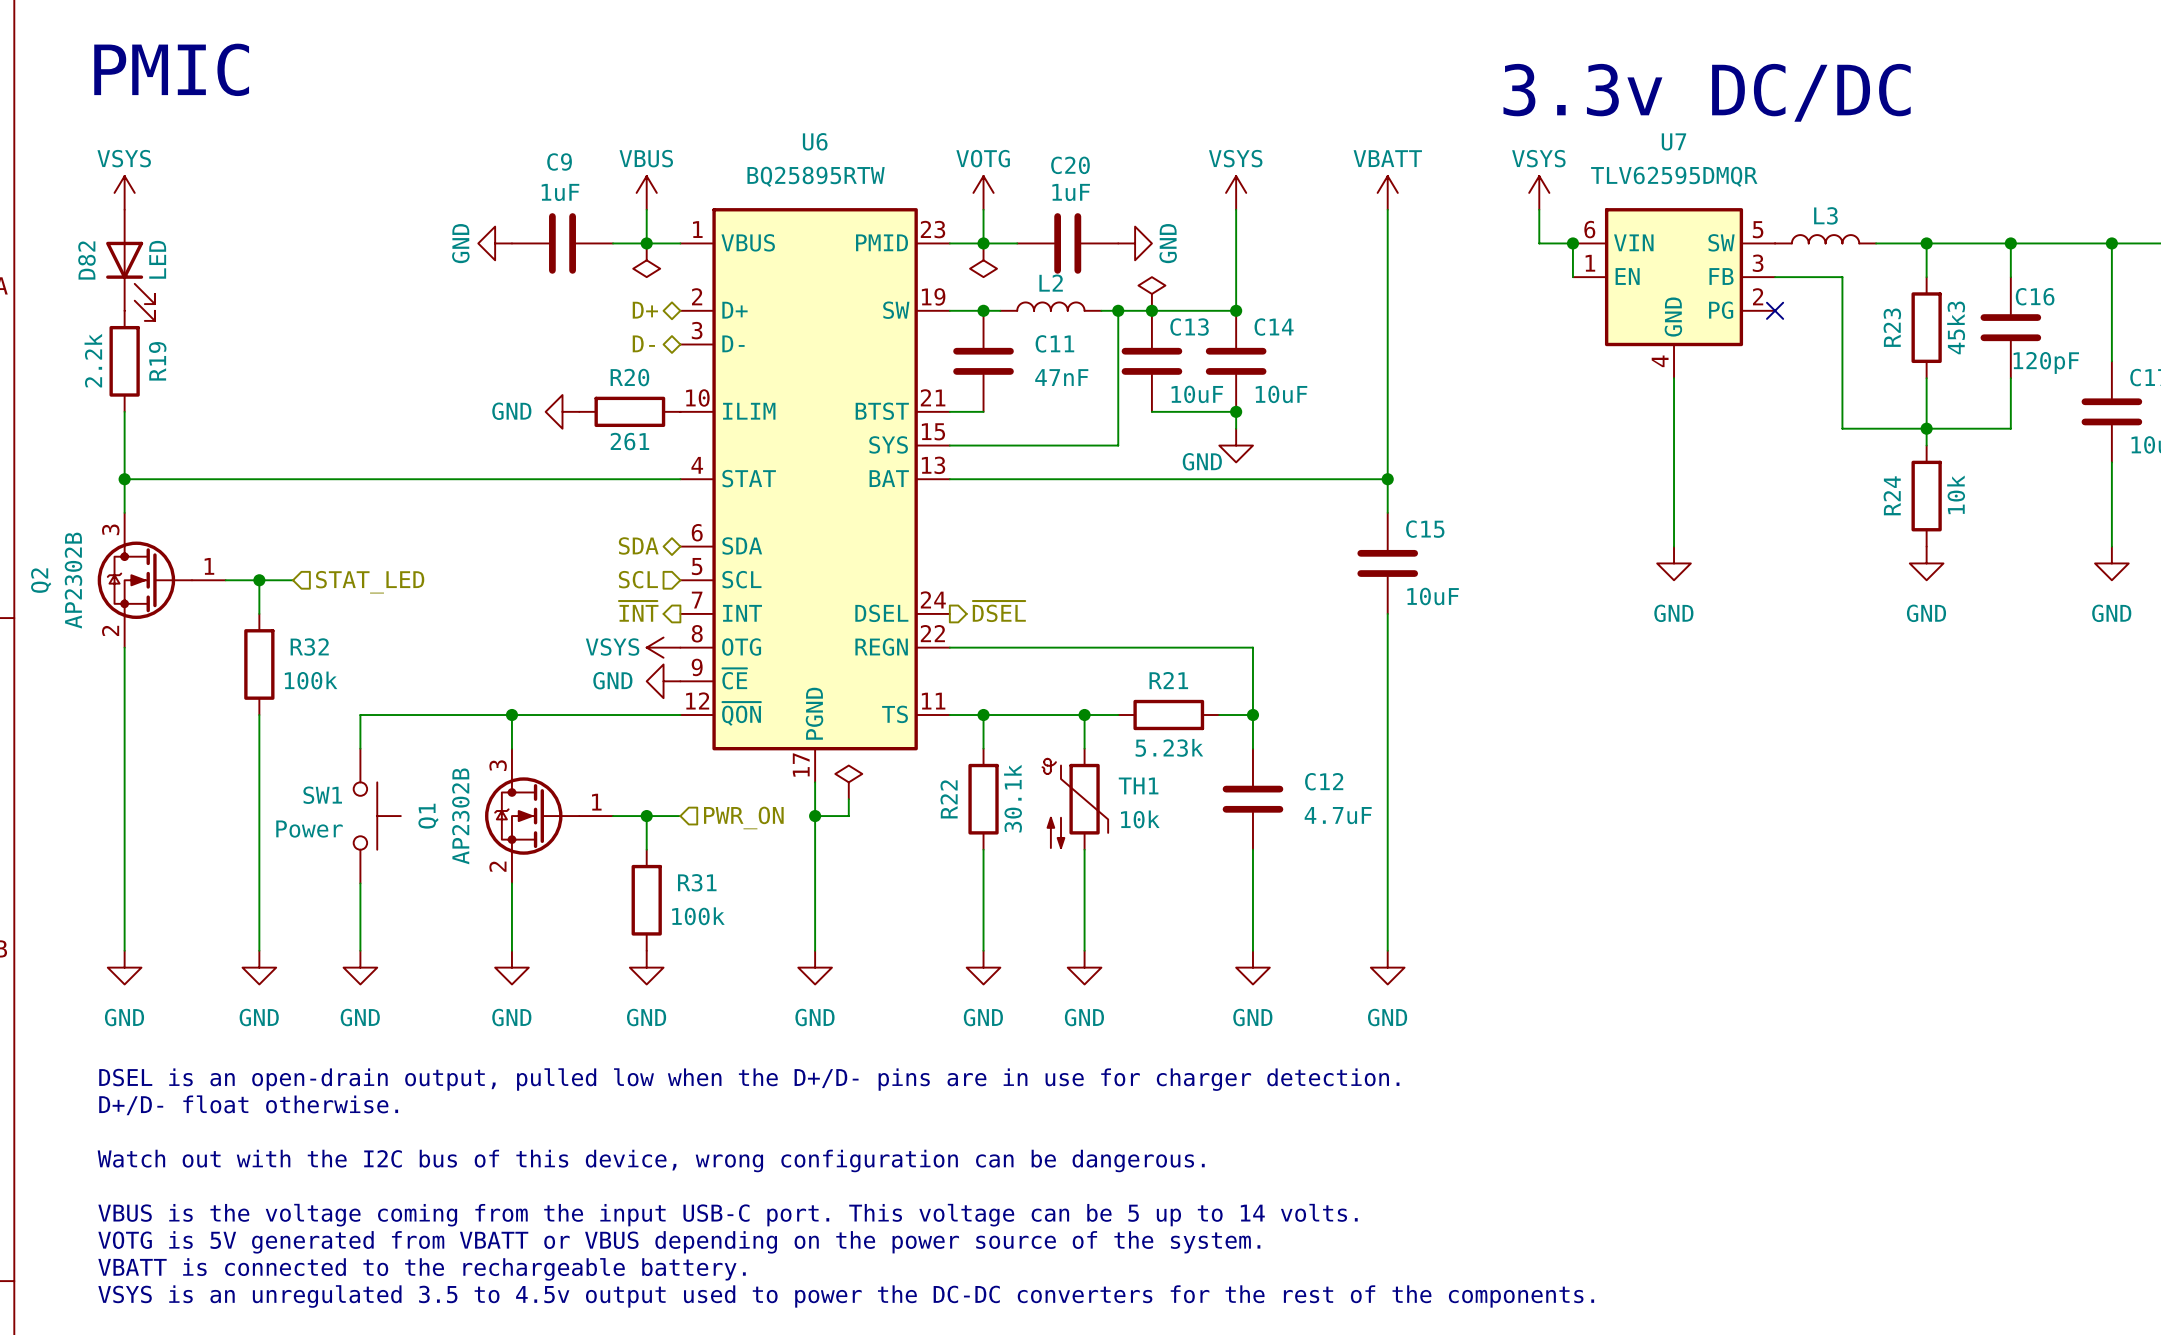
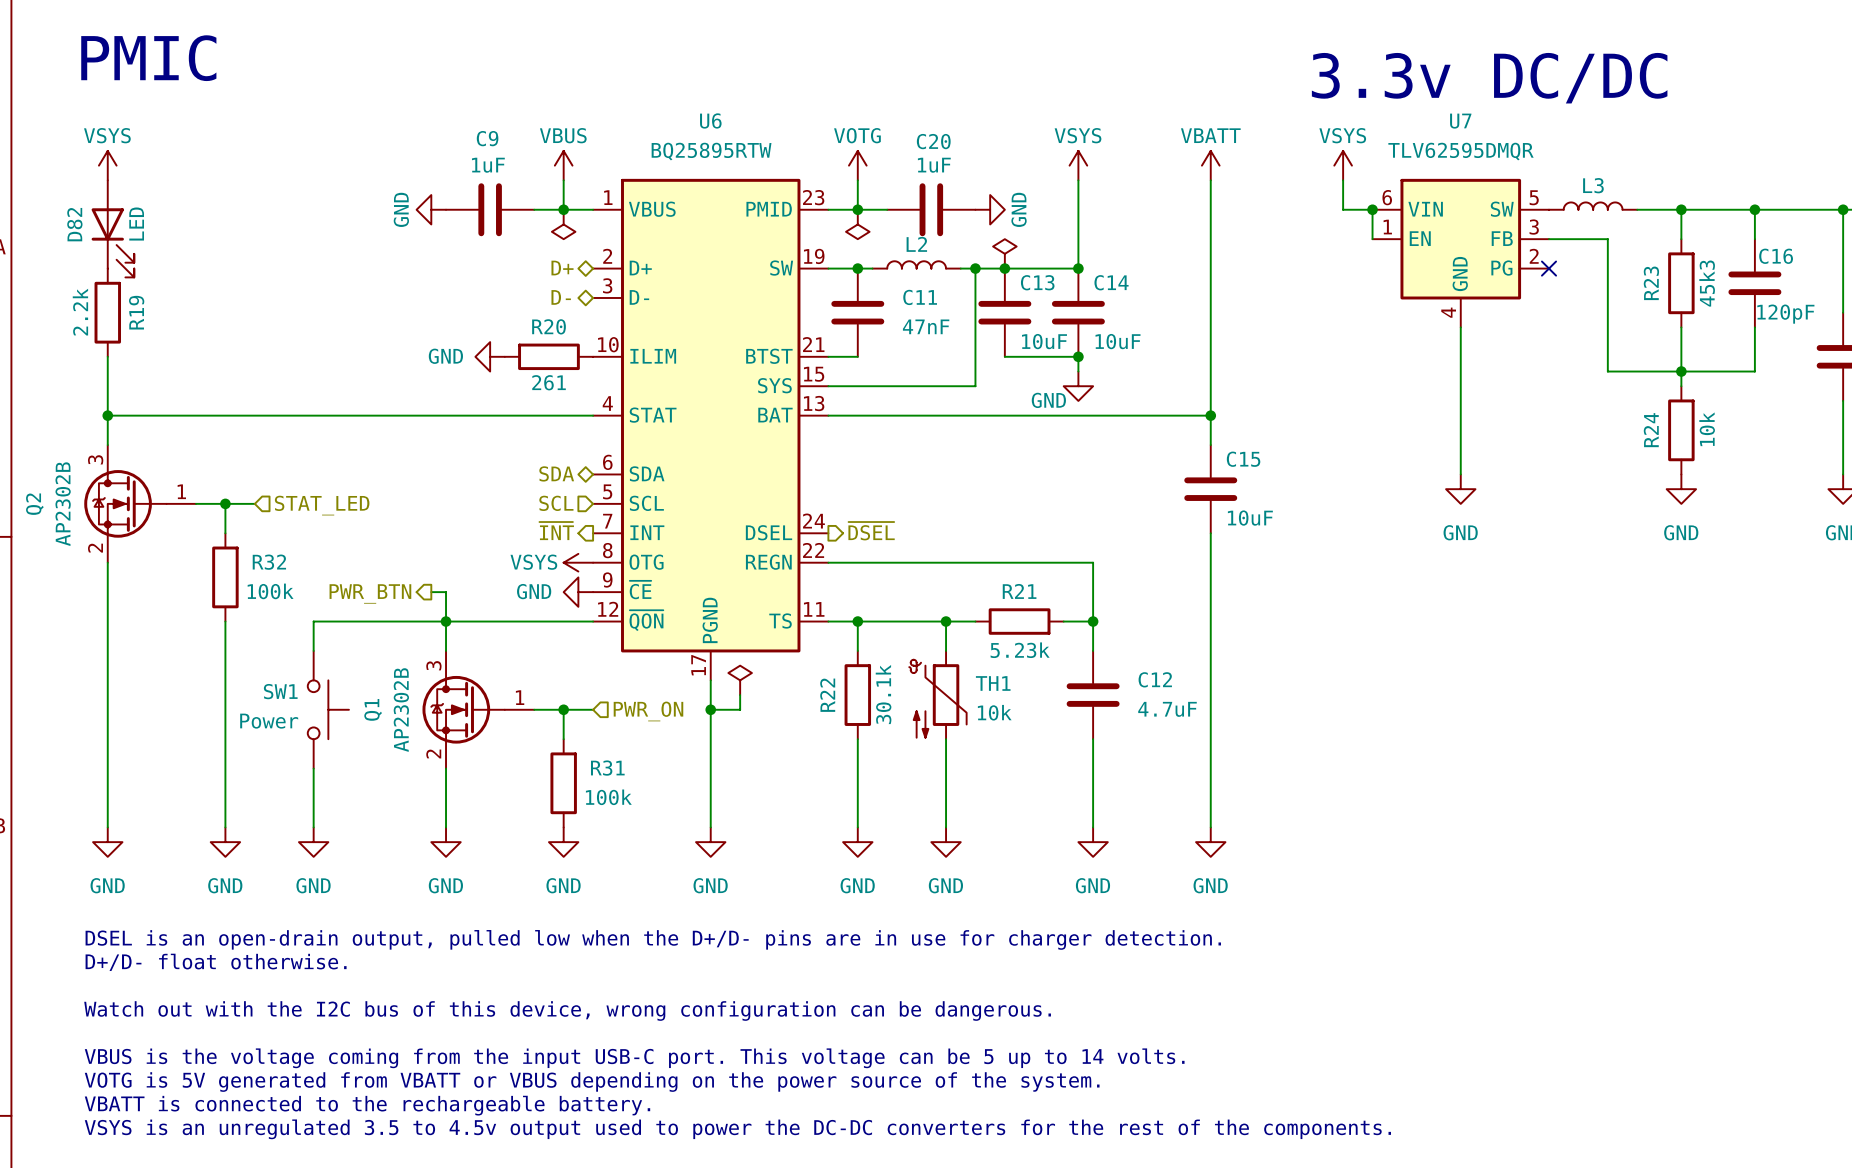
wire: none -> (431, 592) (446, 592) (446, 621)
hierarchical label: none -> PWR_BTN (370, 593)

